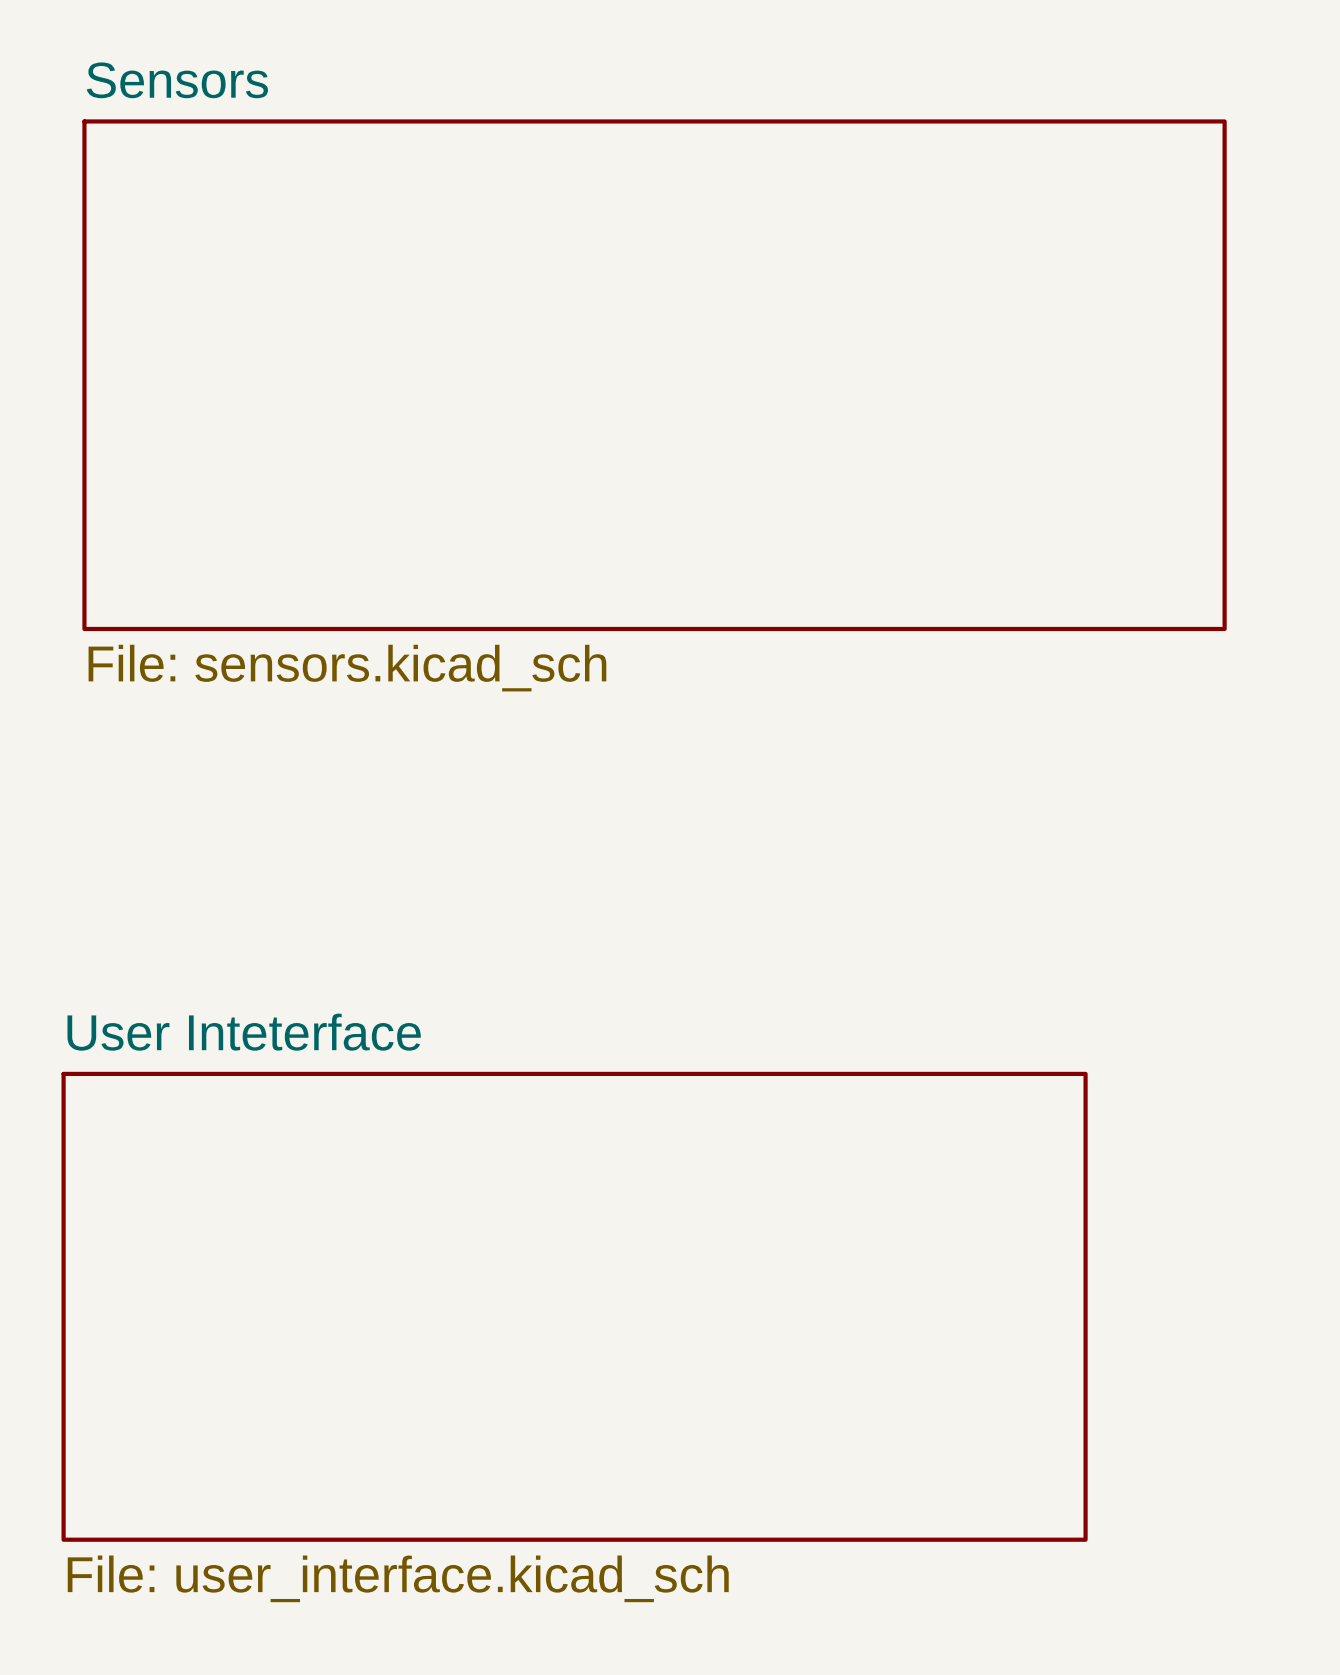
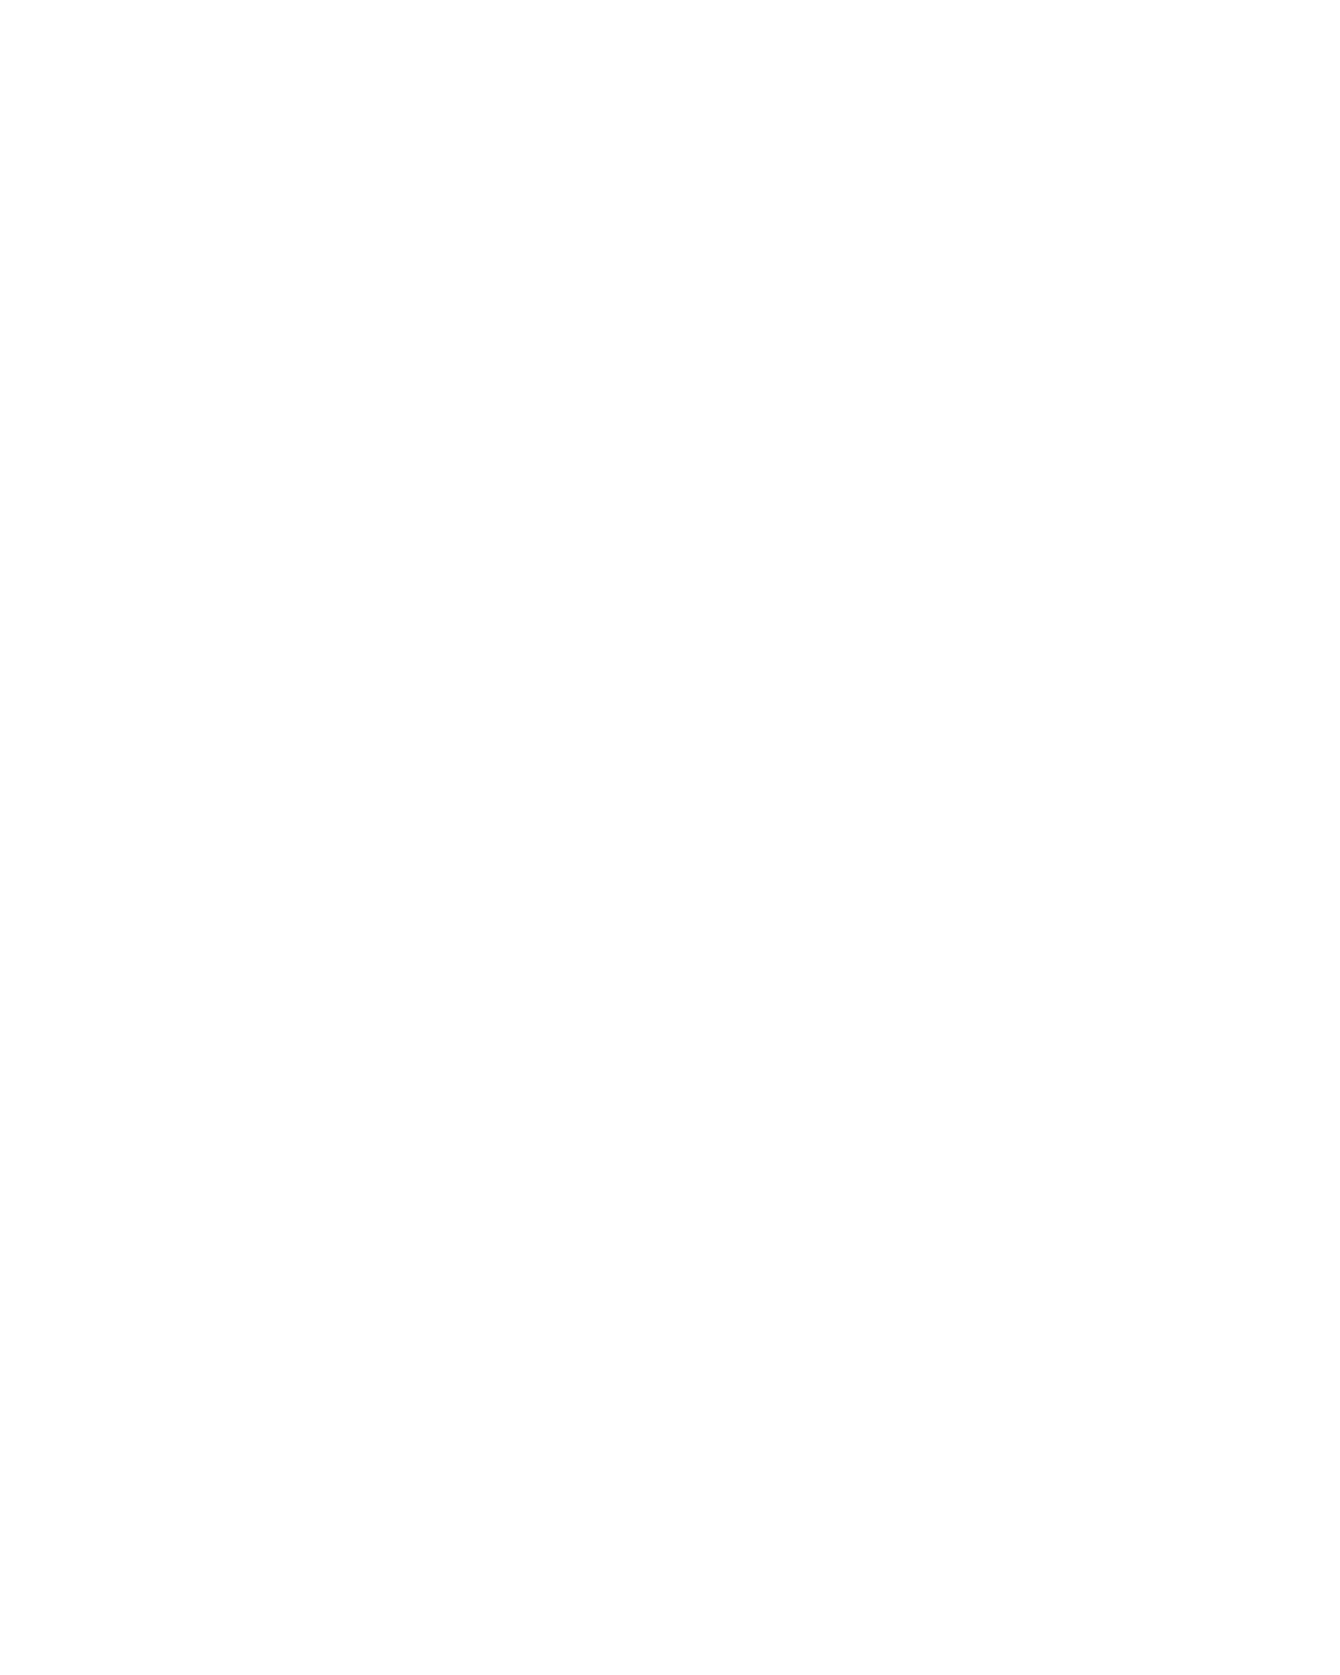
sheet Sensors: File: sensors.kicad_sch (654, 375) -> none
sheet User Inteterface: File: user_interface.kicad_sch (574, 1306) -> none

